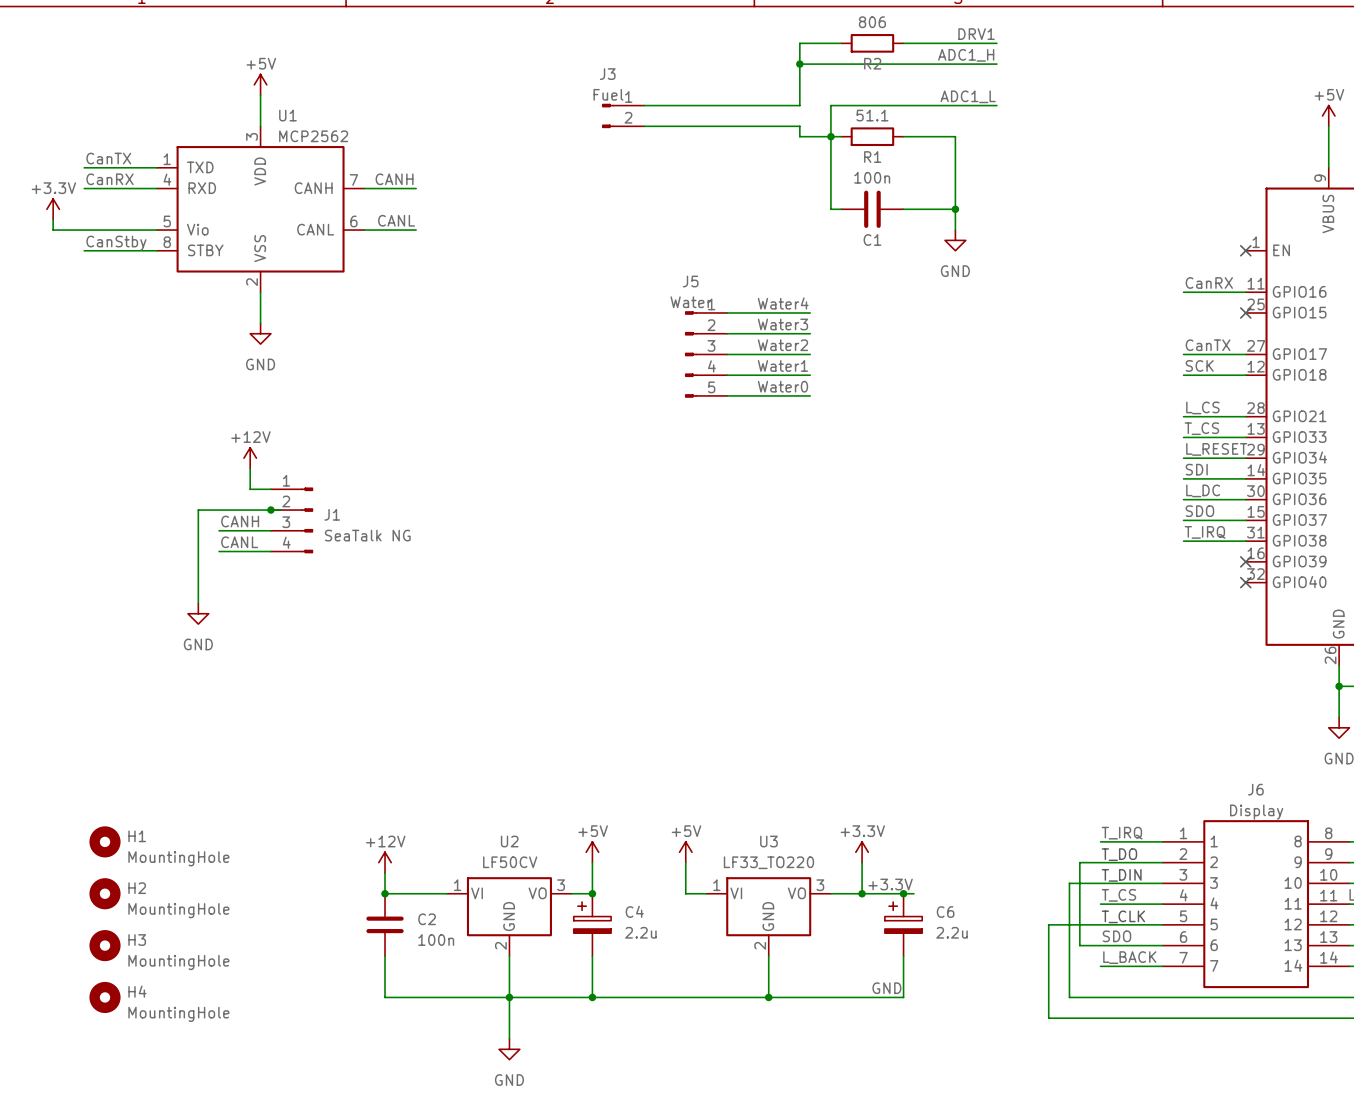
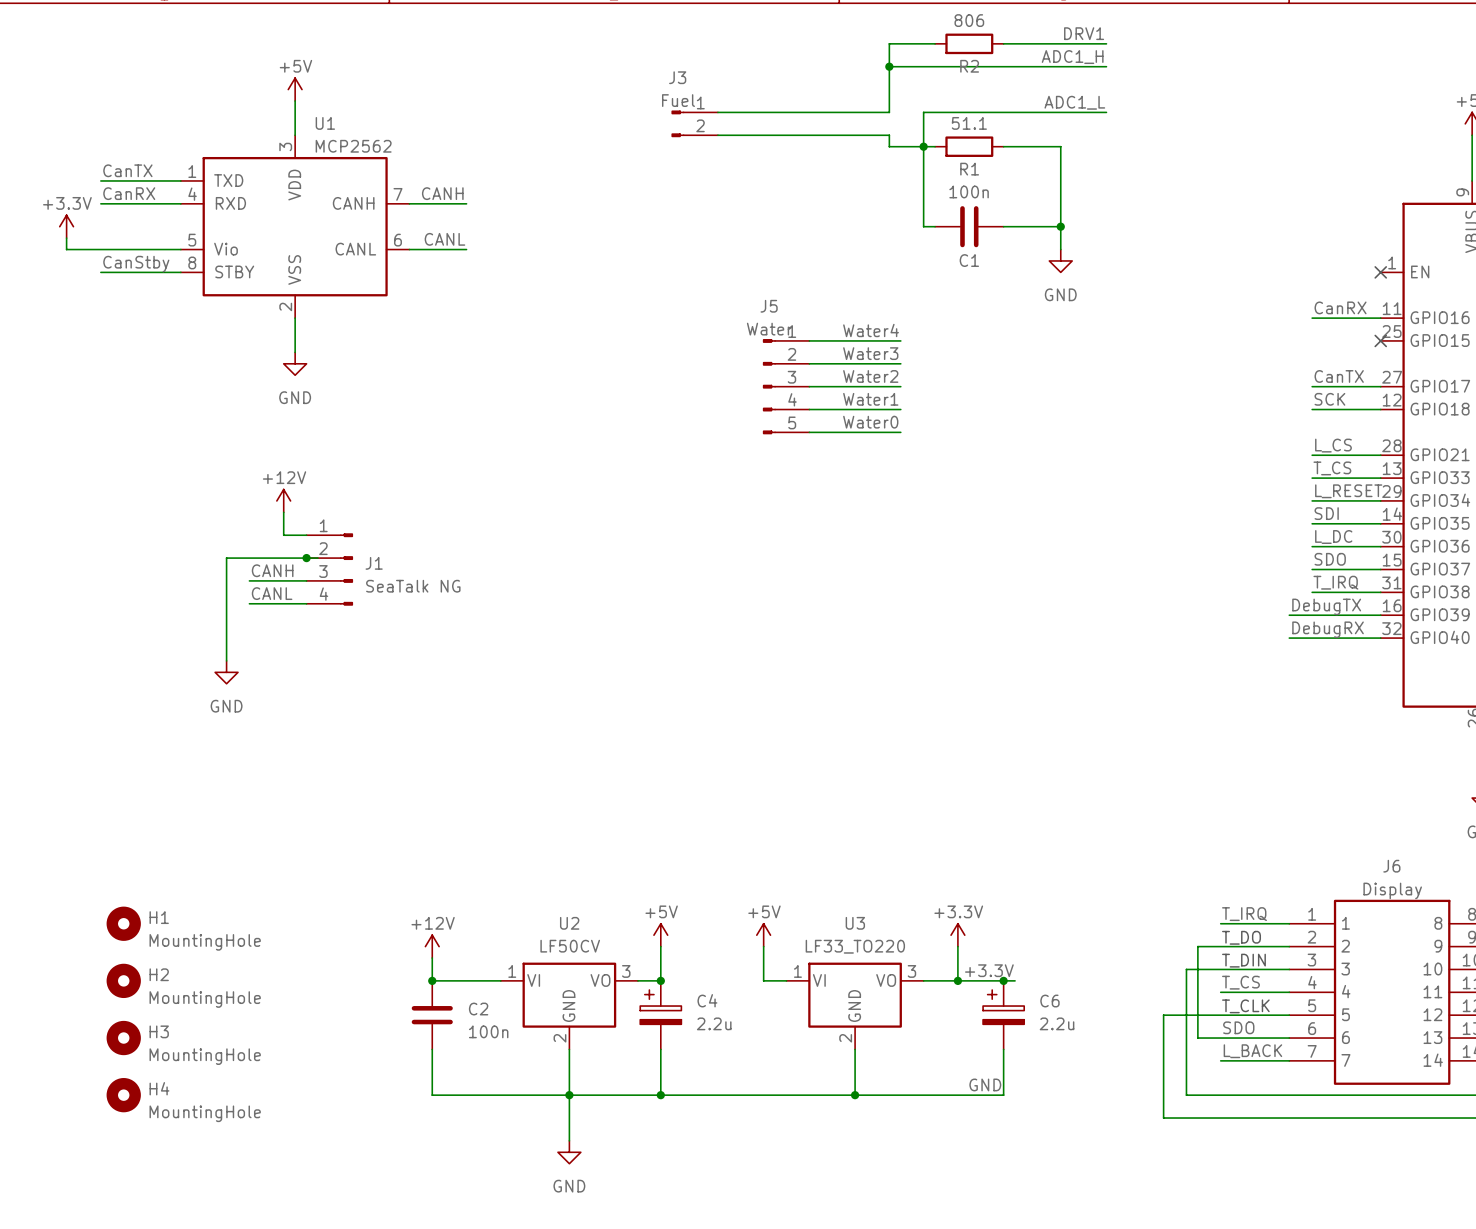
label: none -> DebugTX (1326, 606)
wire: none -> (1289, 615) (1380, 615)
no-connect mark: (1245, 561) -> none
label: none -> DebugRX (1328, 629)
wire: none -> (1289, 638) (1380, 638)
no-connect mark: (1245, 582) -> none

